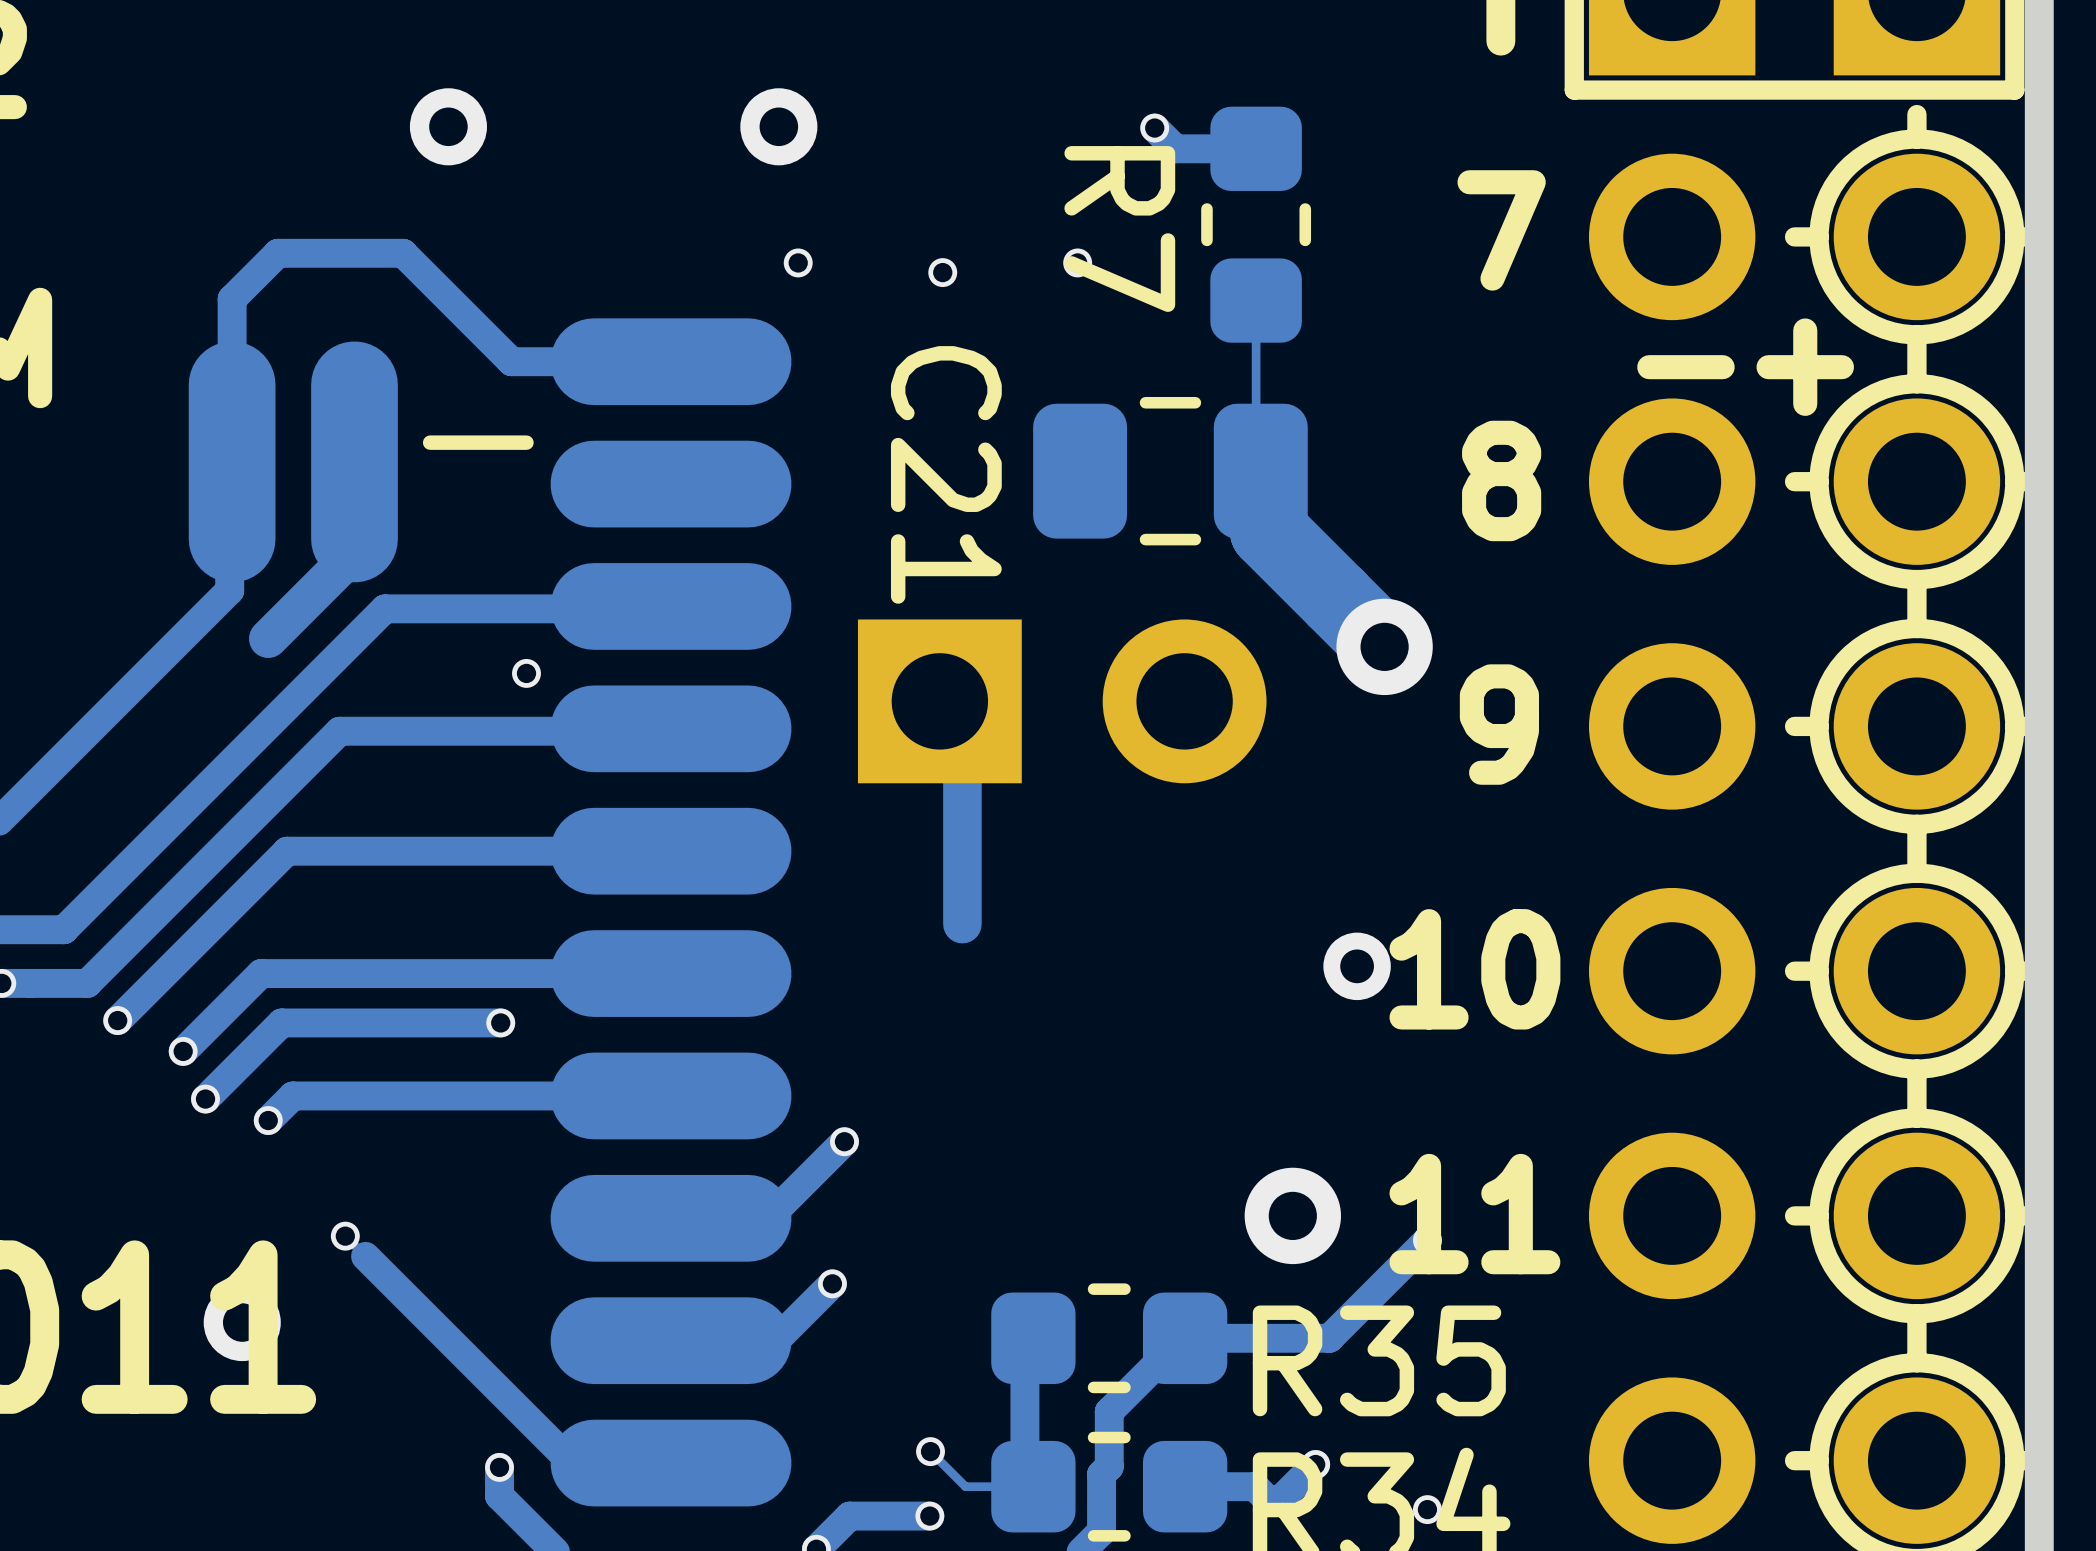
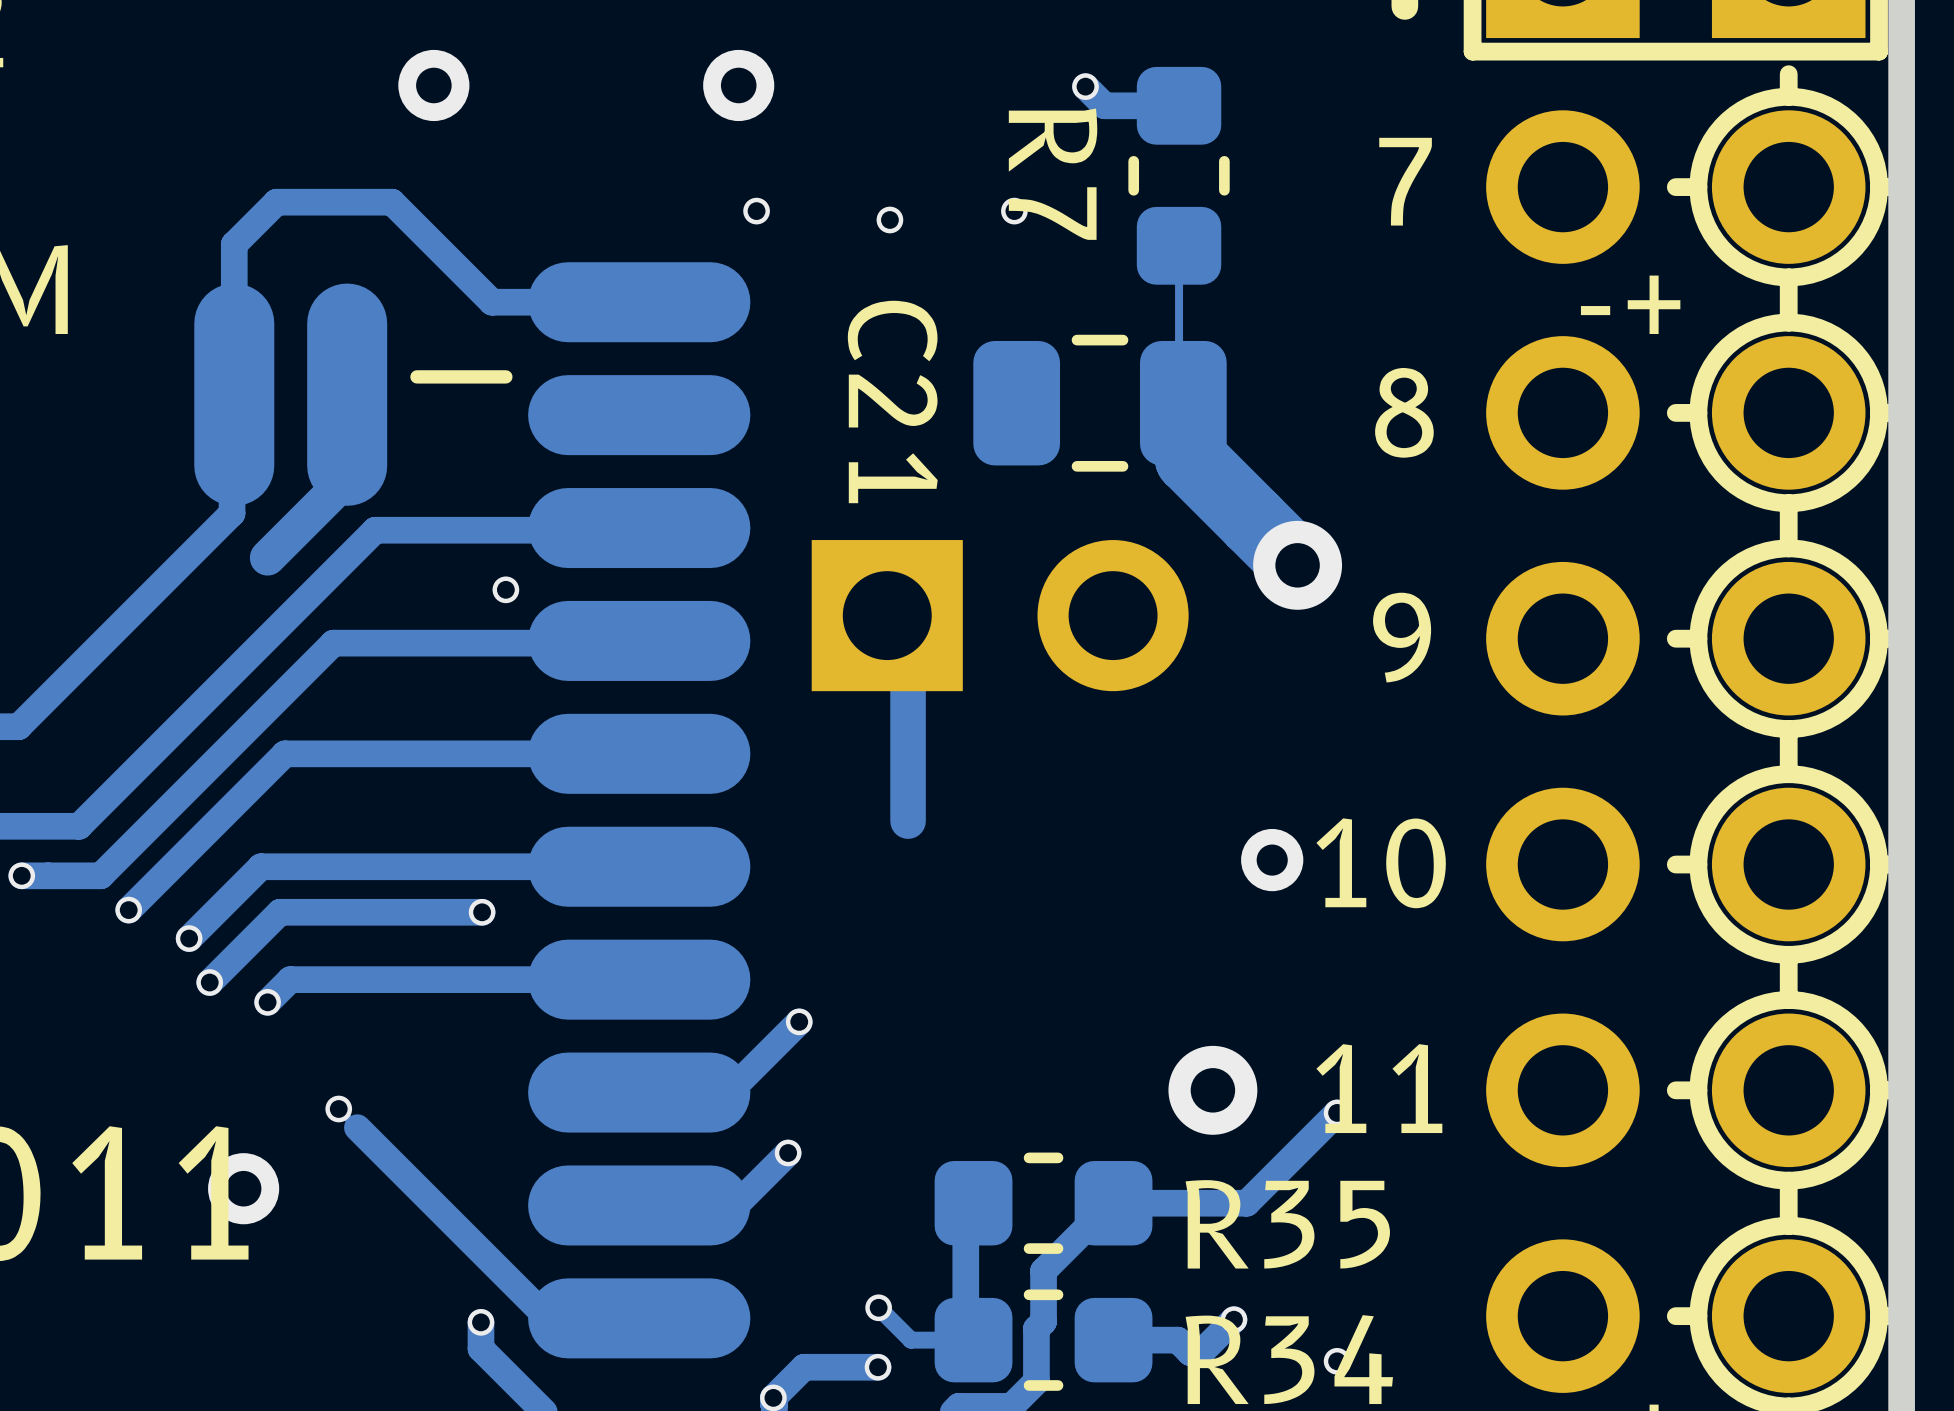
track width: thin (930, 1451) (965, 1486) (1024, 1486) -> thick (878, 1307) (911, 1340) (965, 1340)

